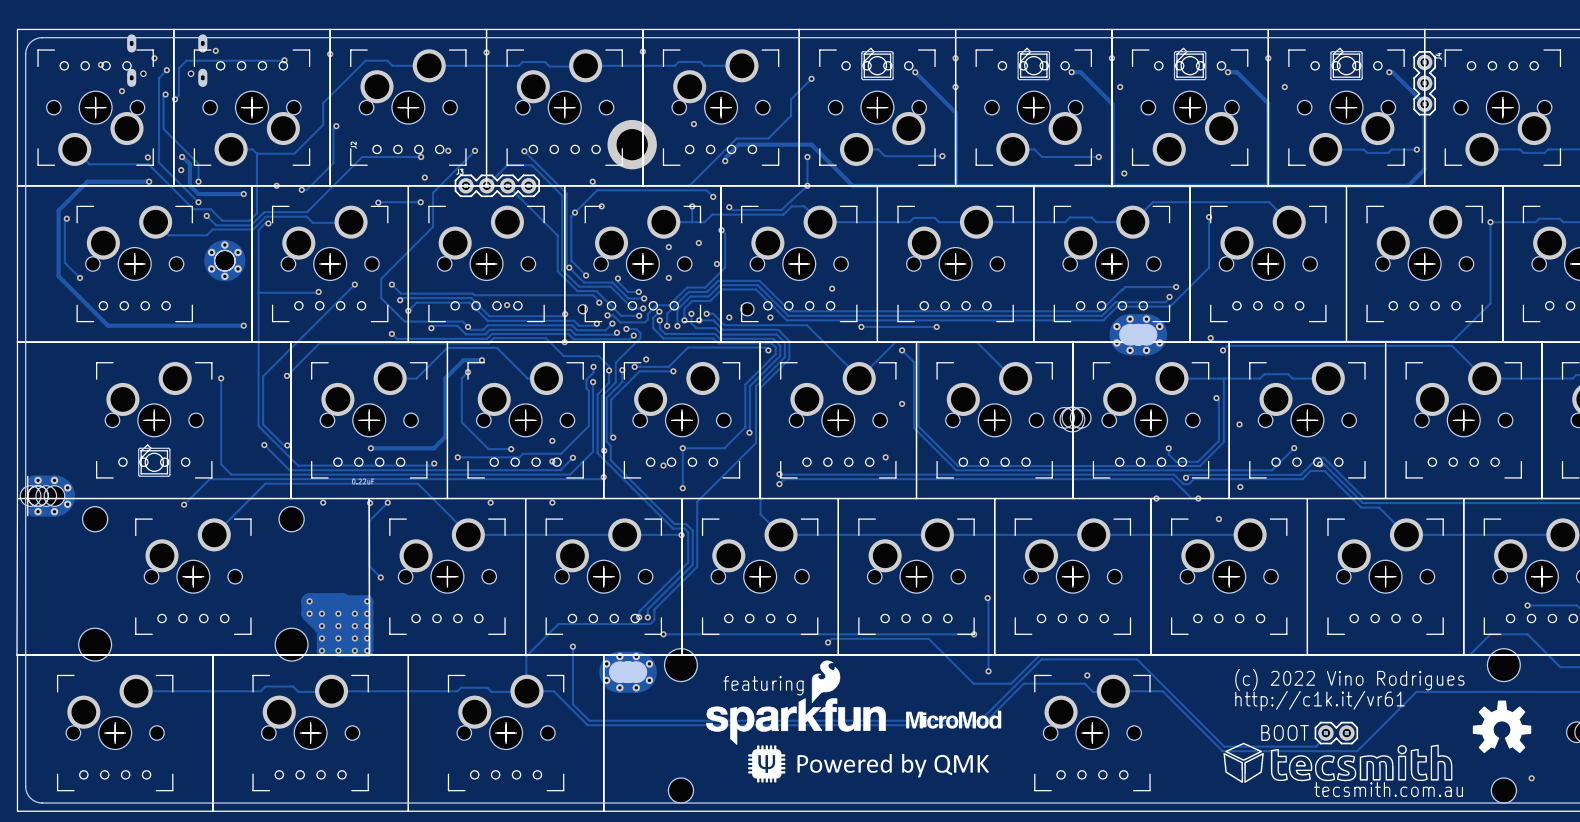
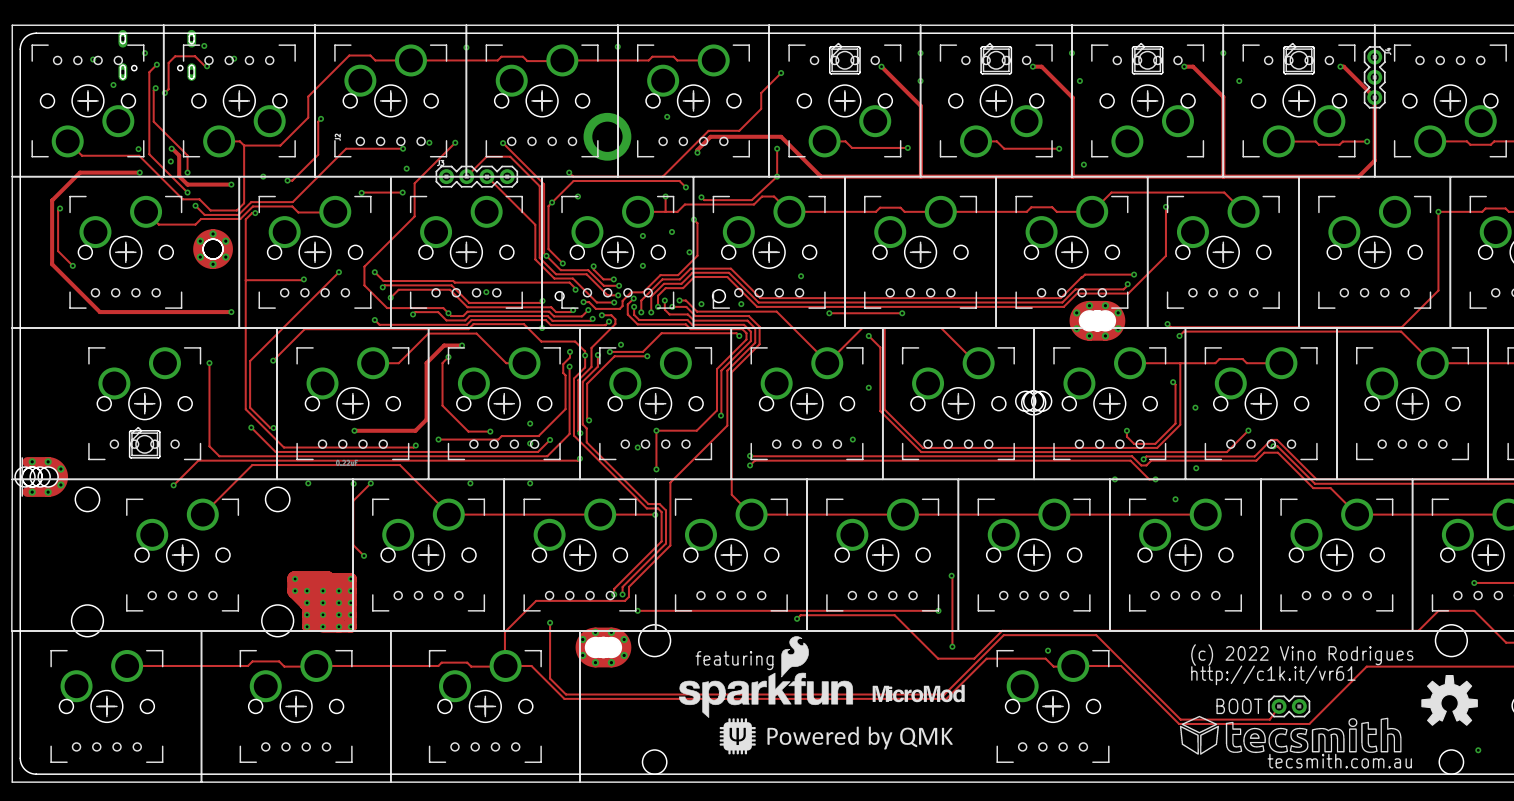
via: (330, 54) -> none
track: (284, 60) (185, 61) -> (207, 66) (195, 56) (175, 56)
via: (284, 60) -> none
via: none -> (234, 58)
via: none -> (207, 66)

